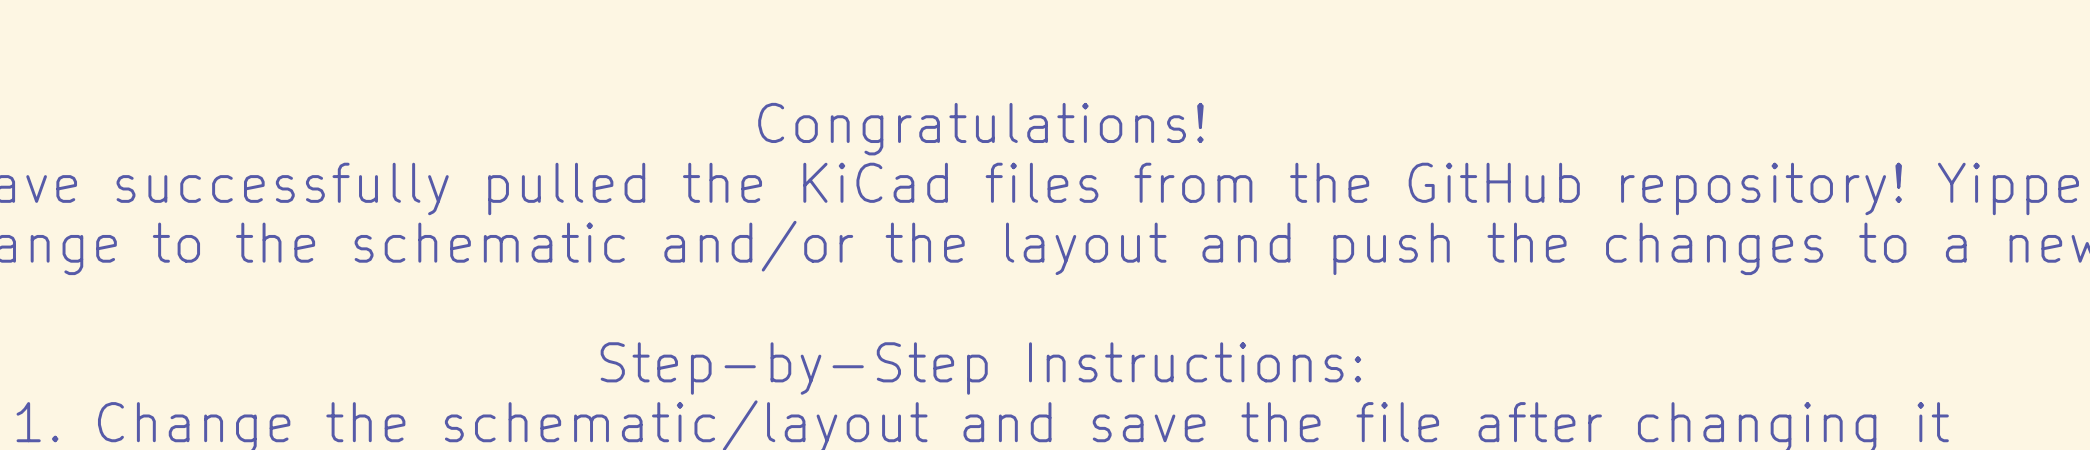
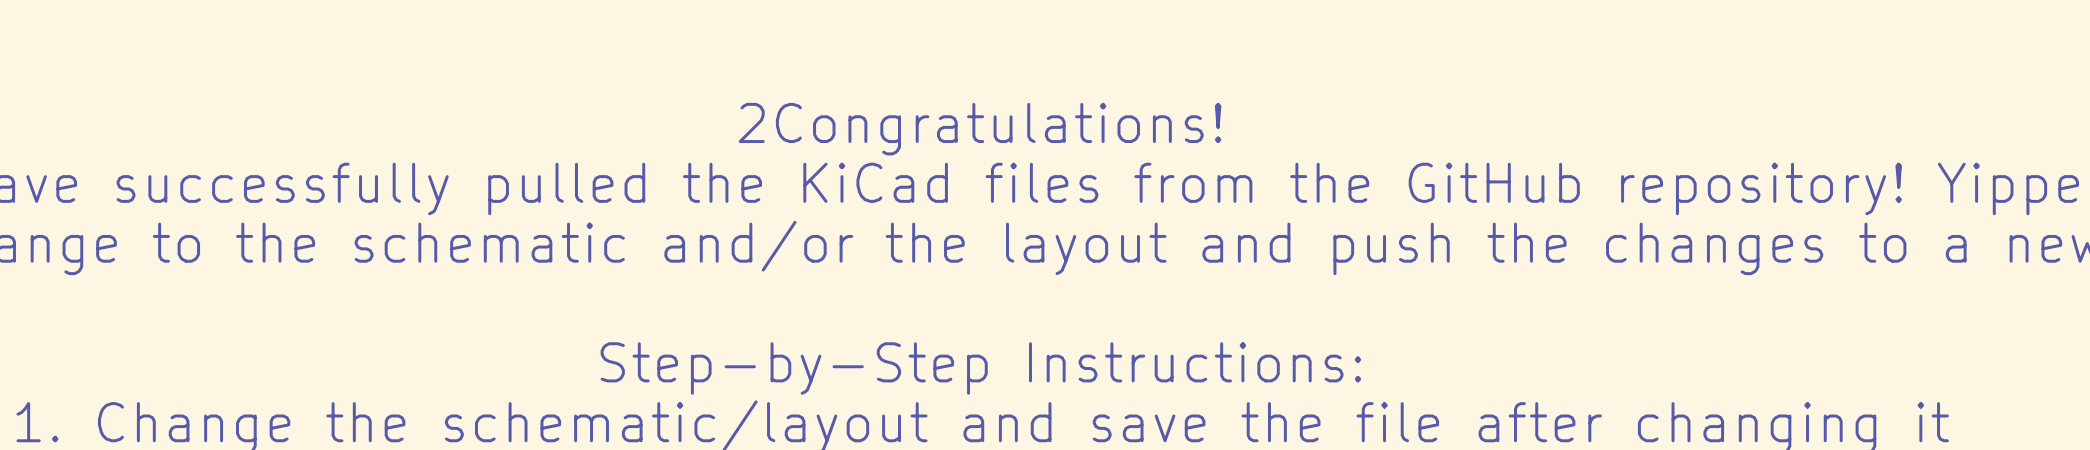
text: Congratulations! (980, 129) -> 2Congratulations! (980, 129)

